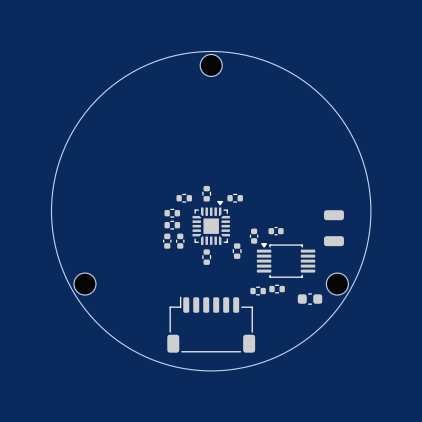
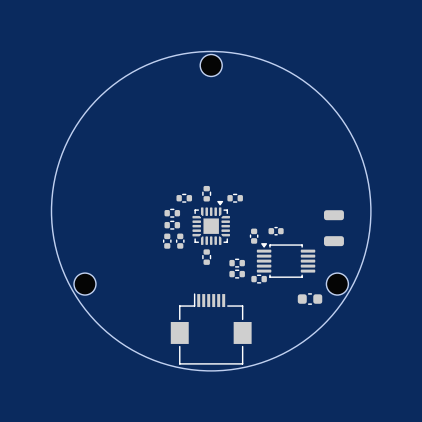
part: (237, 251) -> none
part: none -> (237, 263)
part: none -> (237, 274)
part: none -> (259, 279)
part: (277, 289) -> none
part: (258, 291) -> none
part footprint: [167, 296, 256, 353] -> [170, 293, 252, 365]

